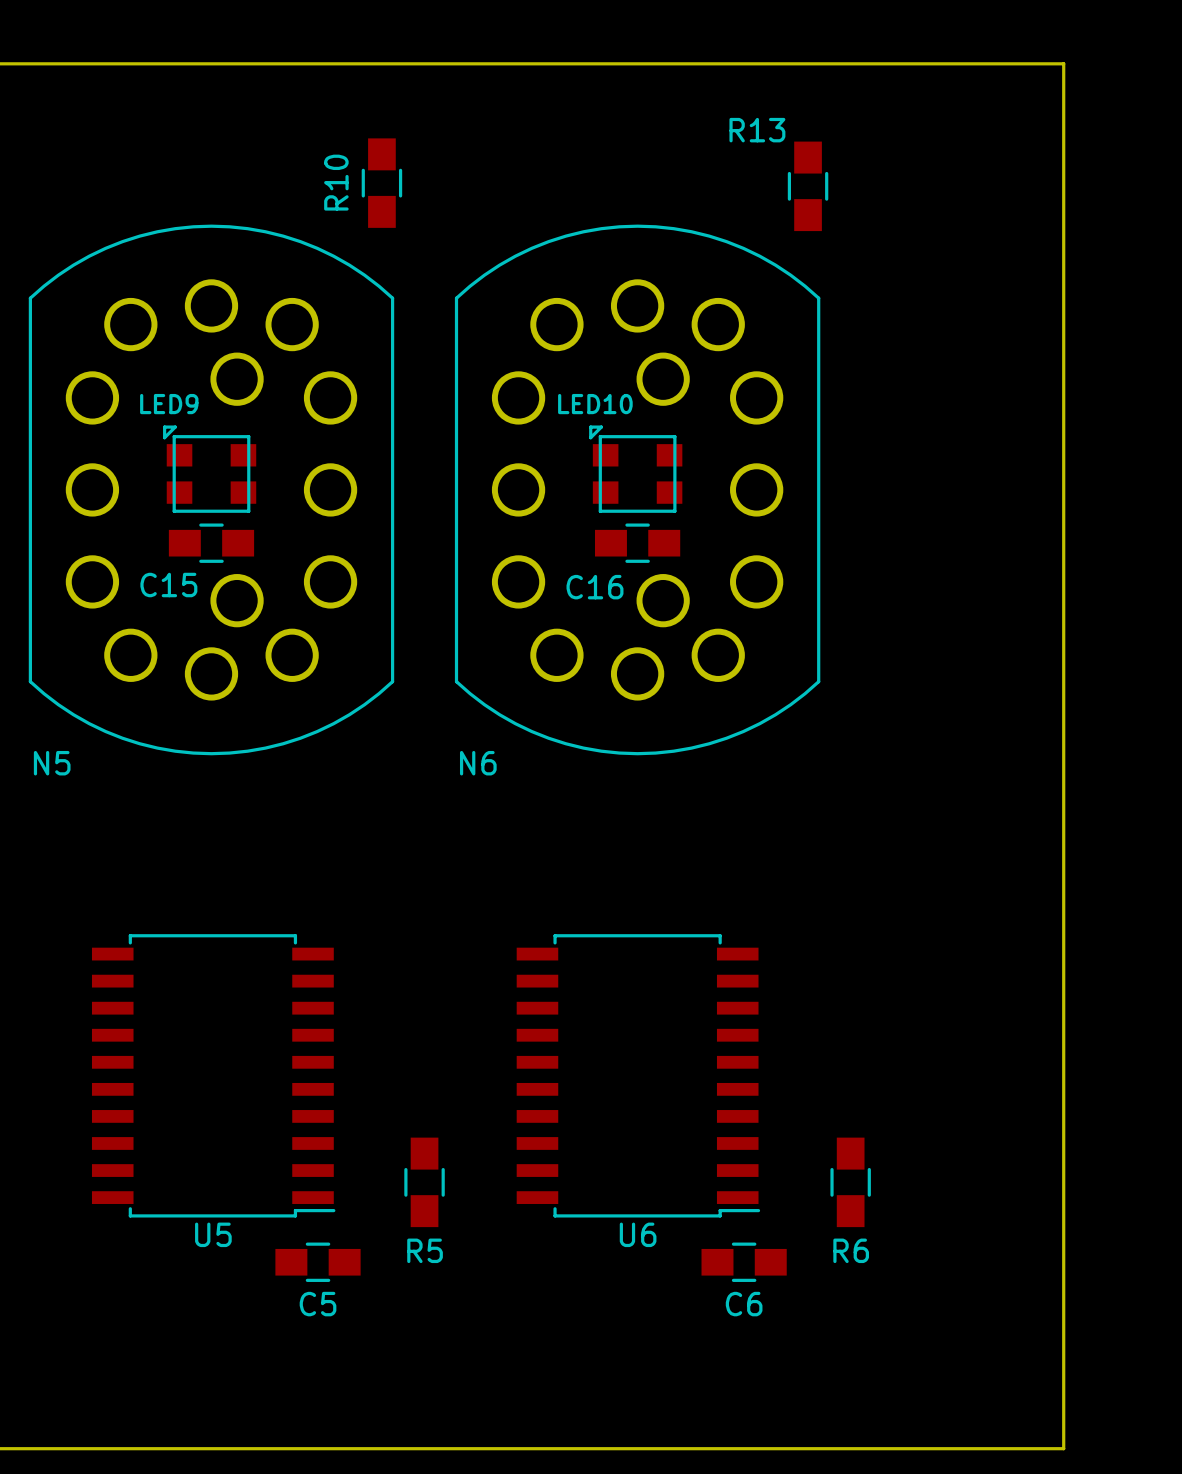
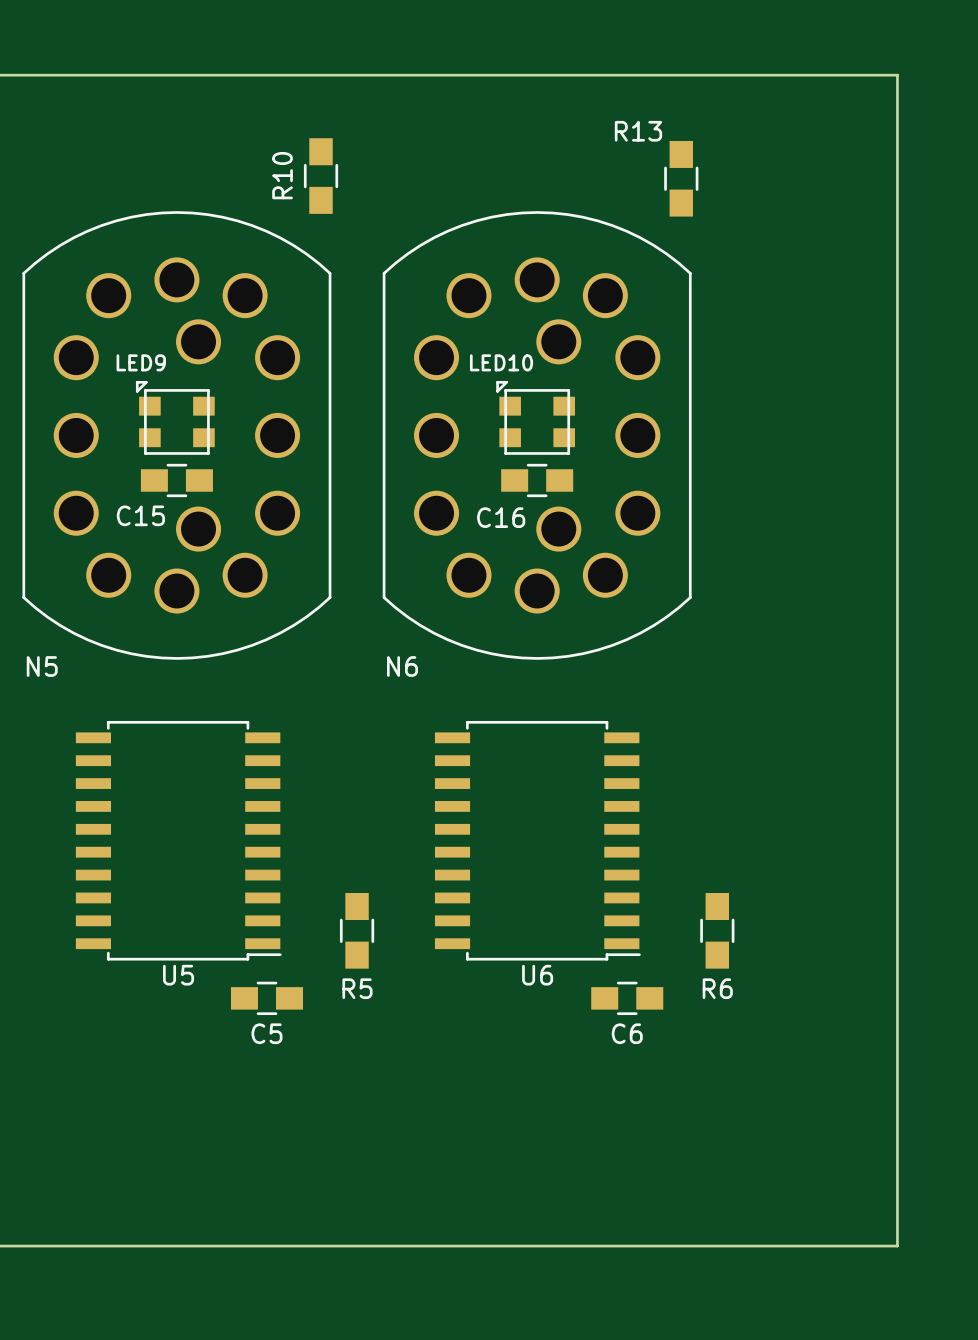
U5 position: (213, 1075) -> (178, 840)
U6 position: (638, 1075) -> (537, 840)
R5 position: (424, 1182) -> (357, 930)
R6 position: (850, 1182) -> (717, 930)
C5 position: (318, 1262) -> (266, 998)
C6 position: (744, 1262) -> (627, 998)

